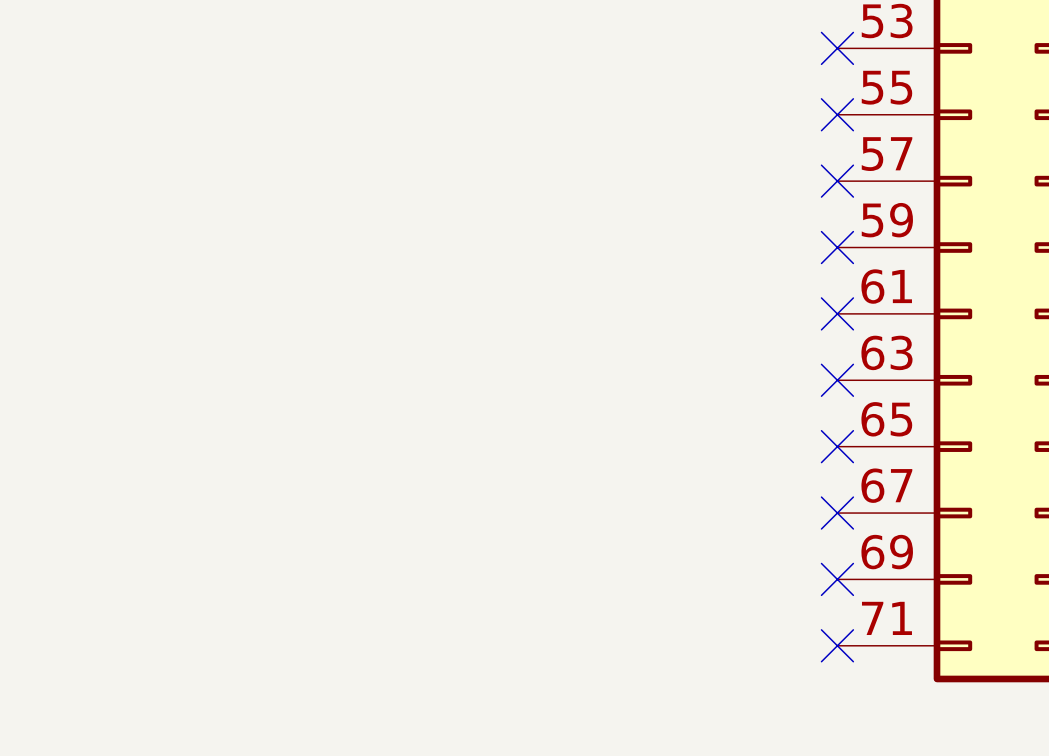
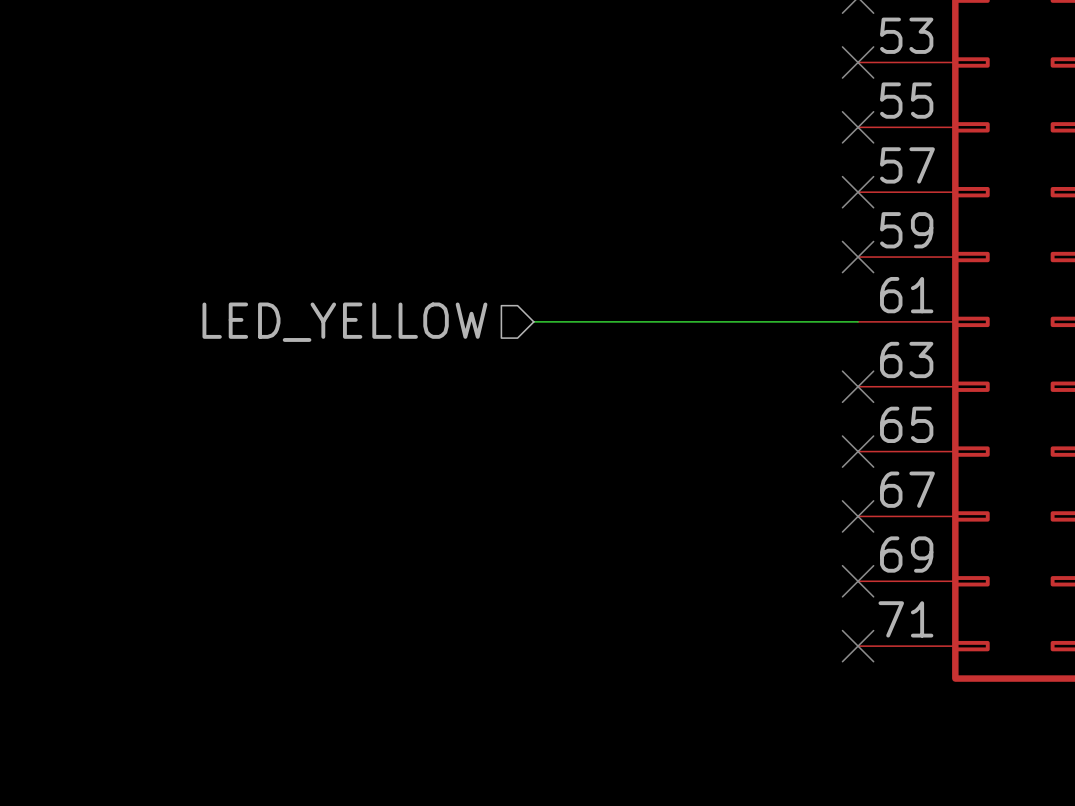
wire: none -> (533, 321) (858, 321)
no-connect mark: (837, 313) -> none
hierarchical label: none -> LED_YELLOW (344, 322)

